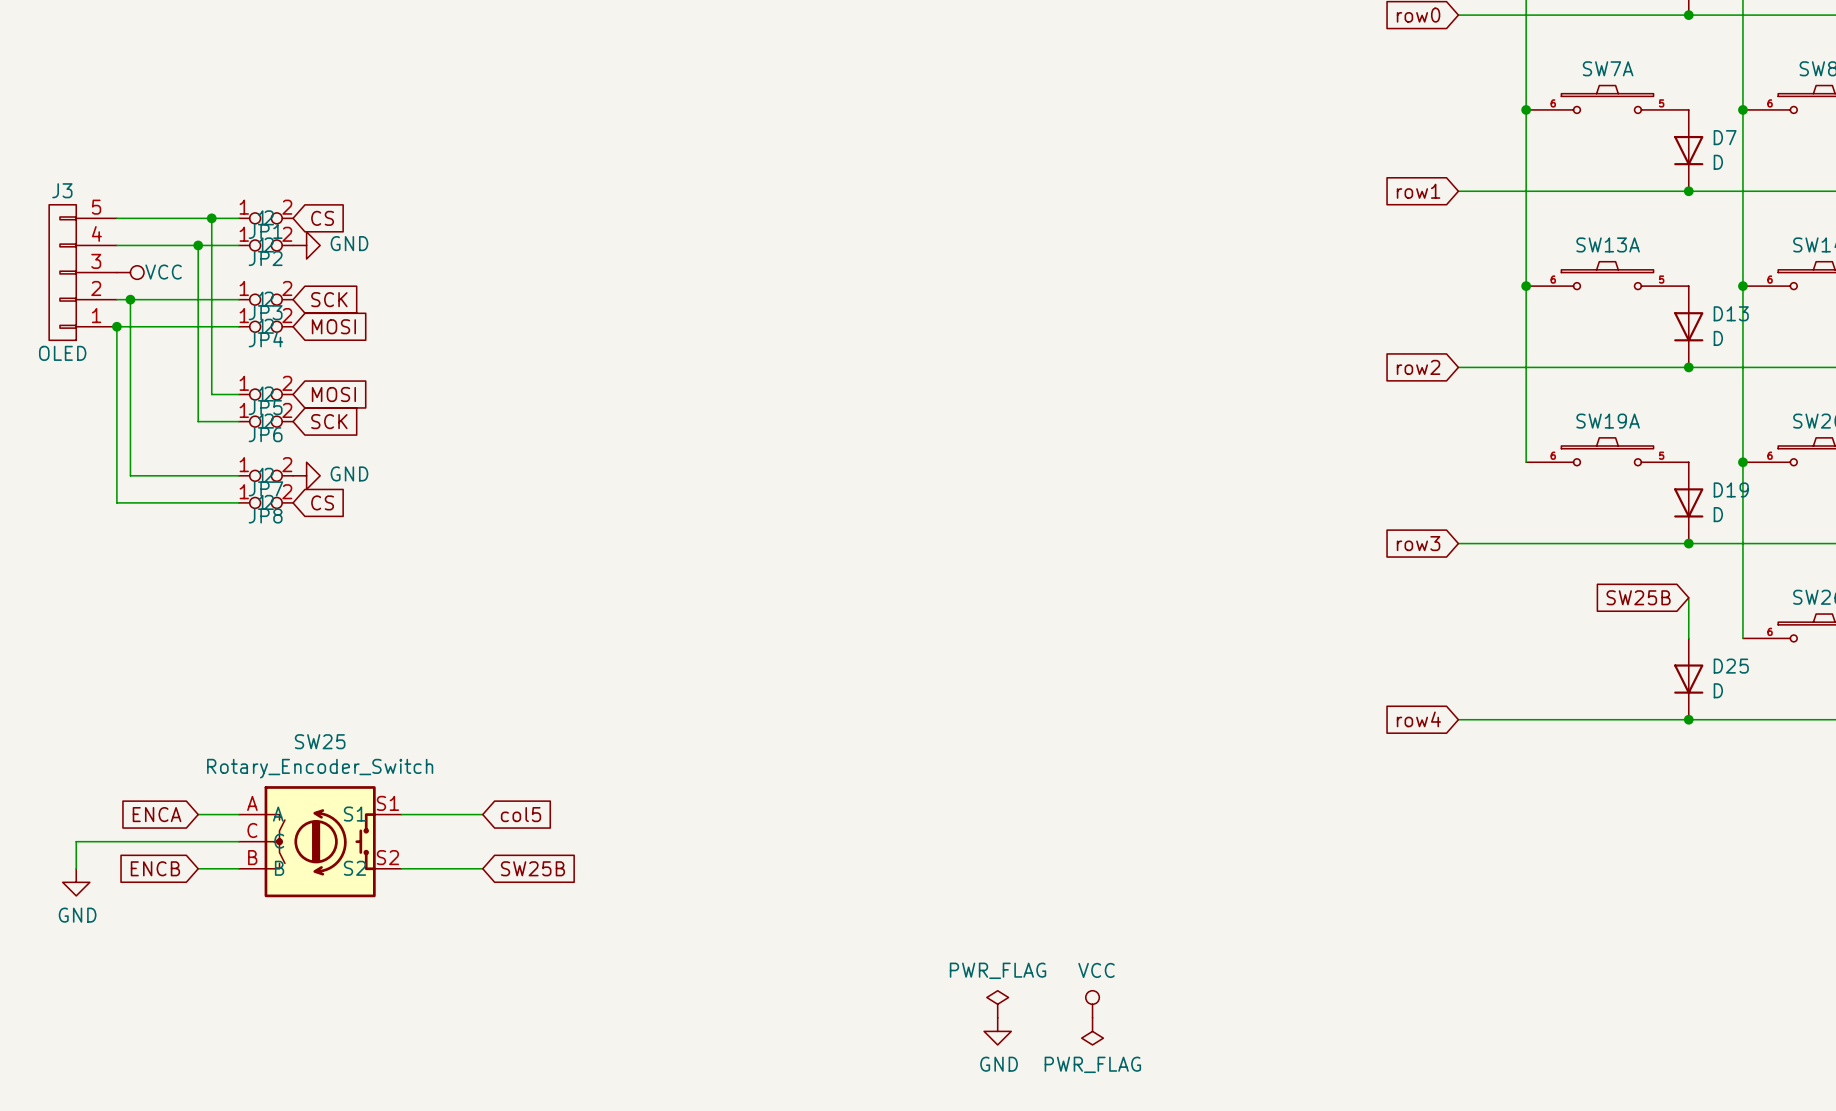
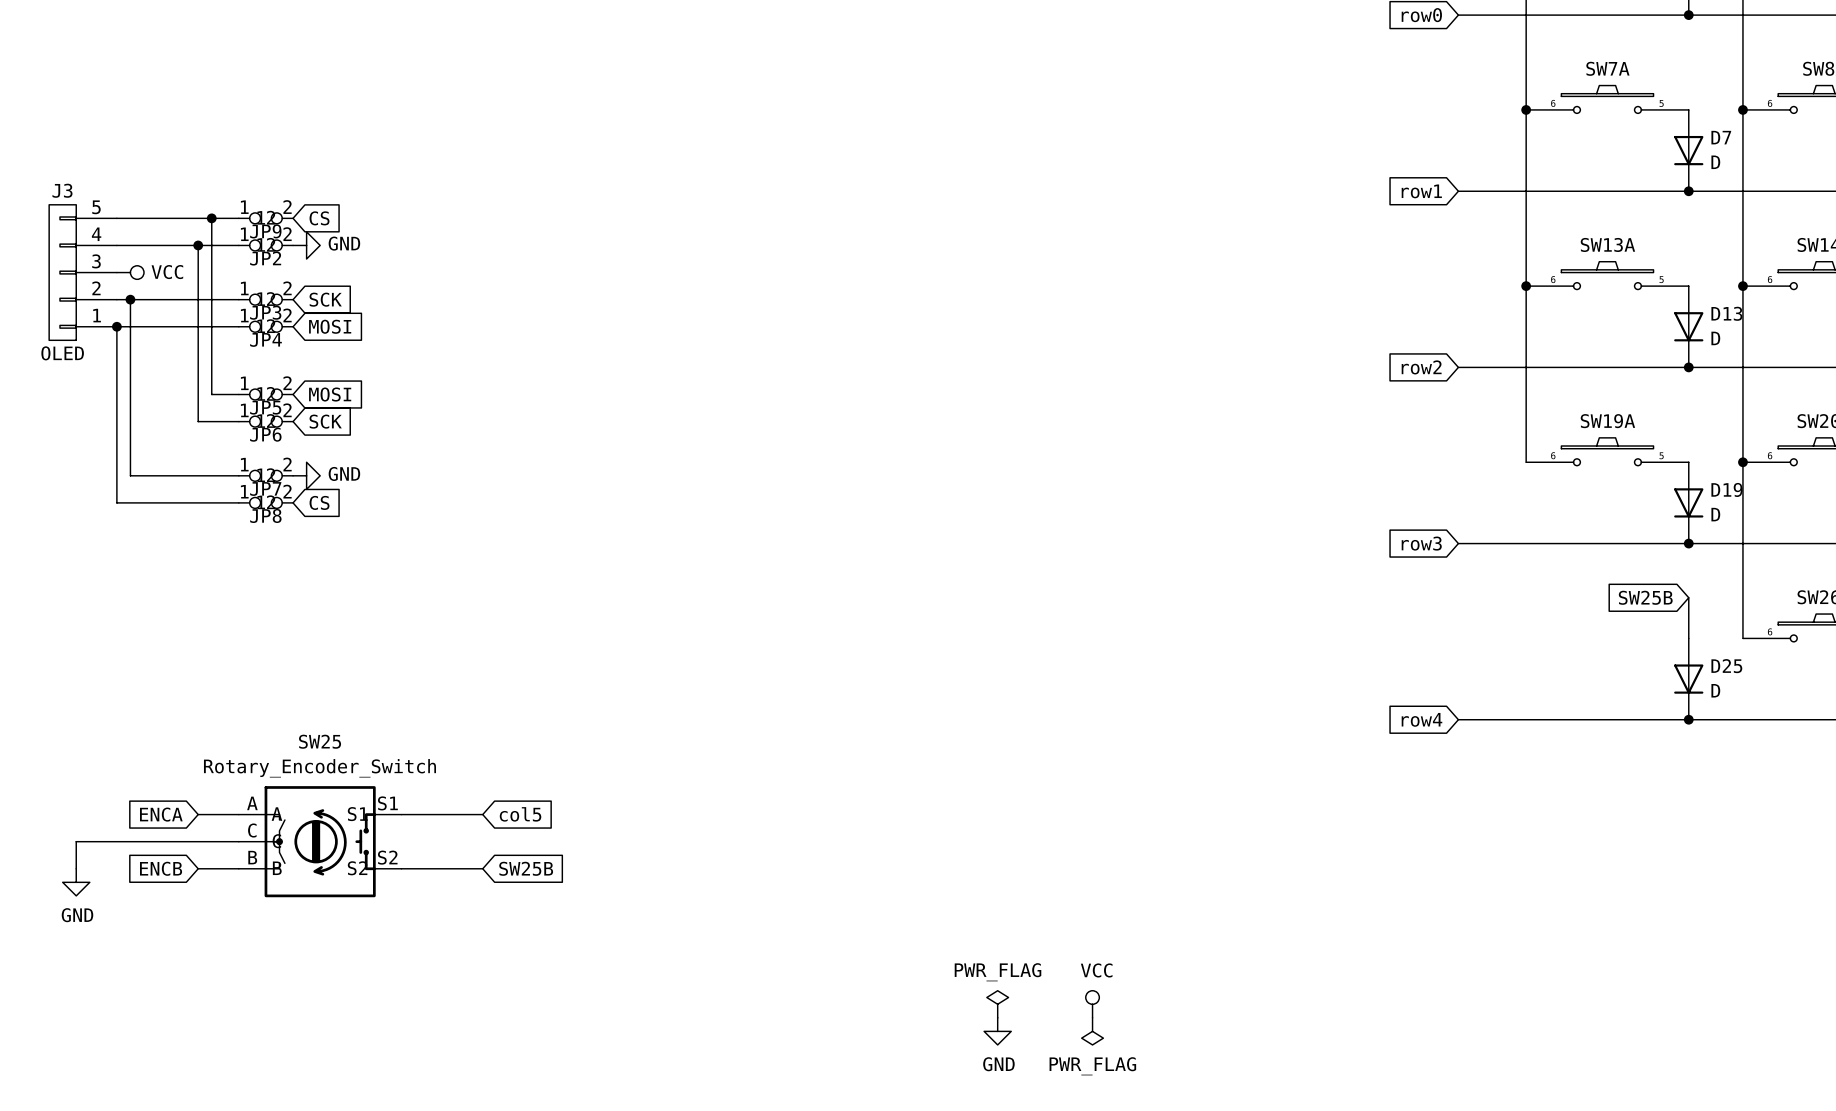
JP1 name: JP1 (265, 231) -> JP9 (265, 231)

